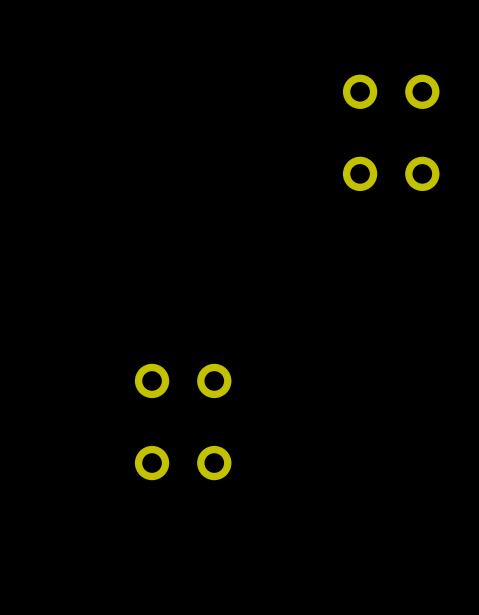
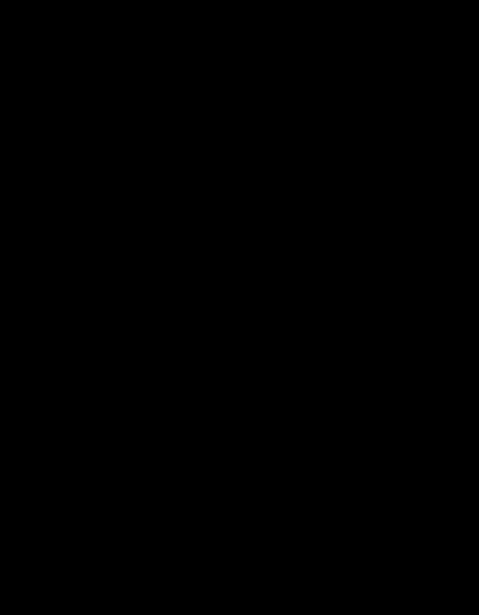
part: (391, 91) -> none
part: (391, 173) -> none
part: (183, 380) -> none
part: (183, 463) -> none

